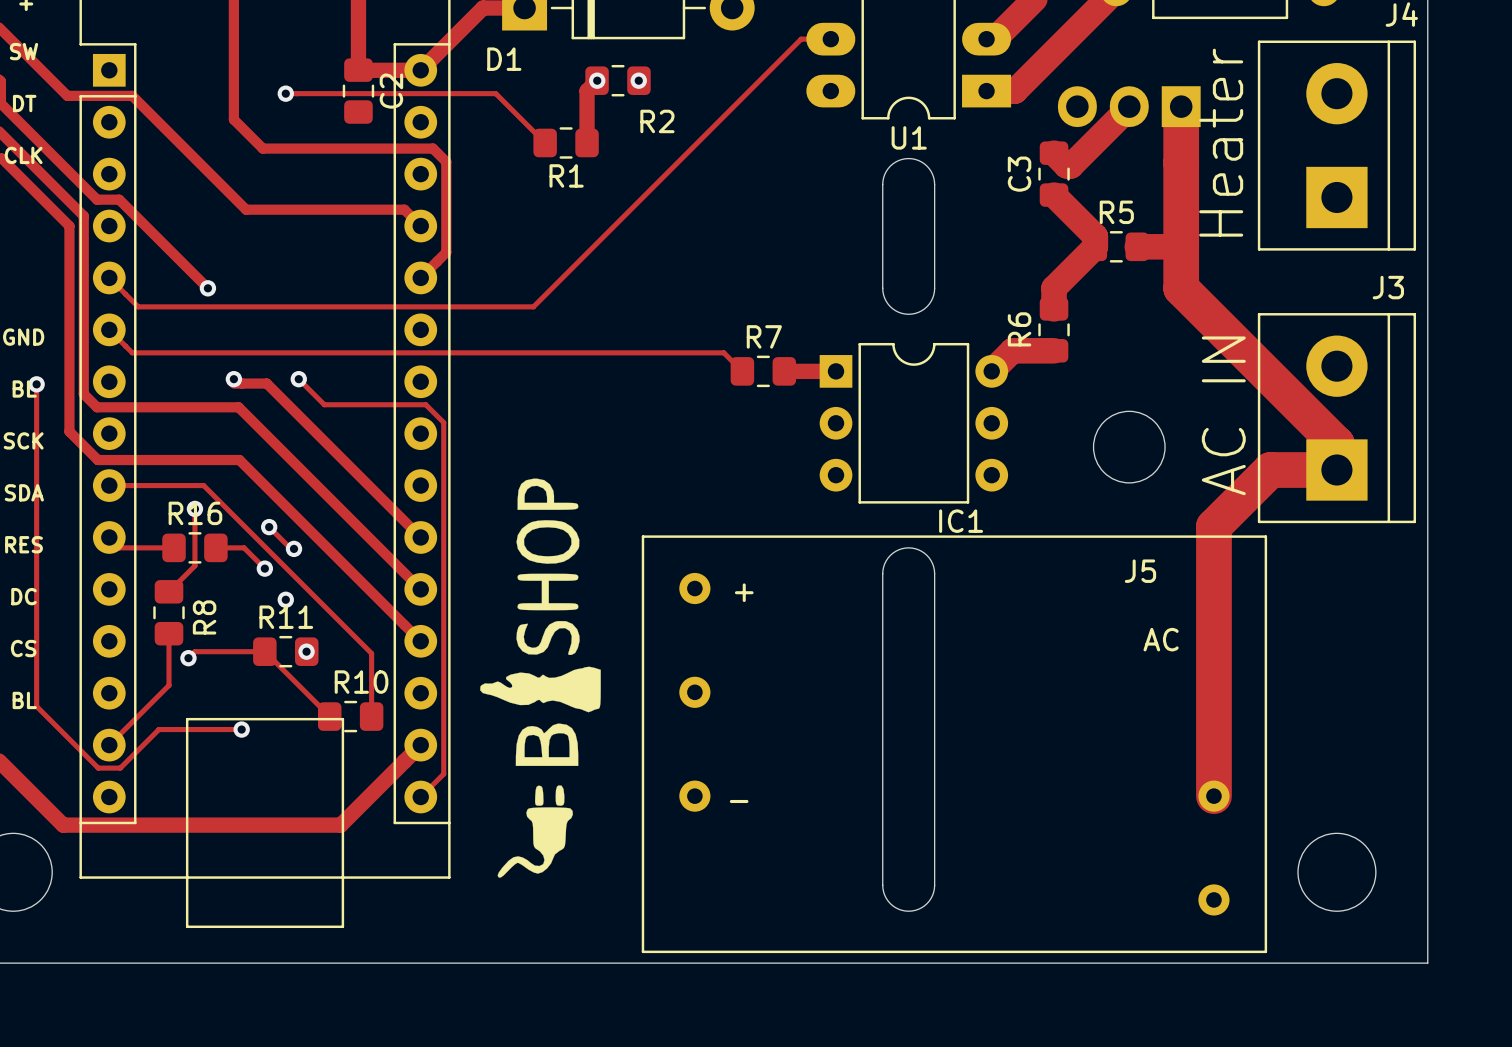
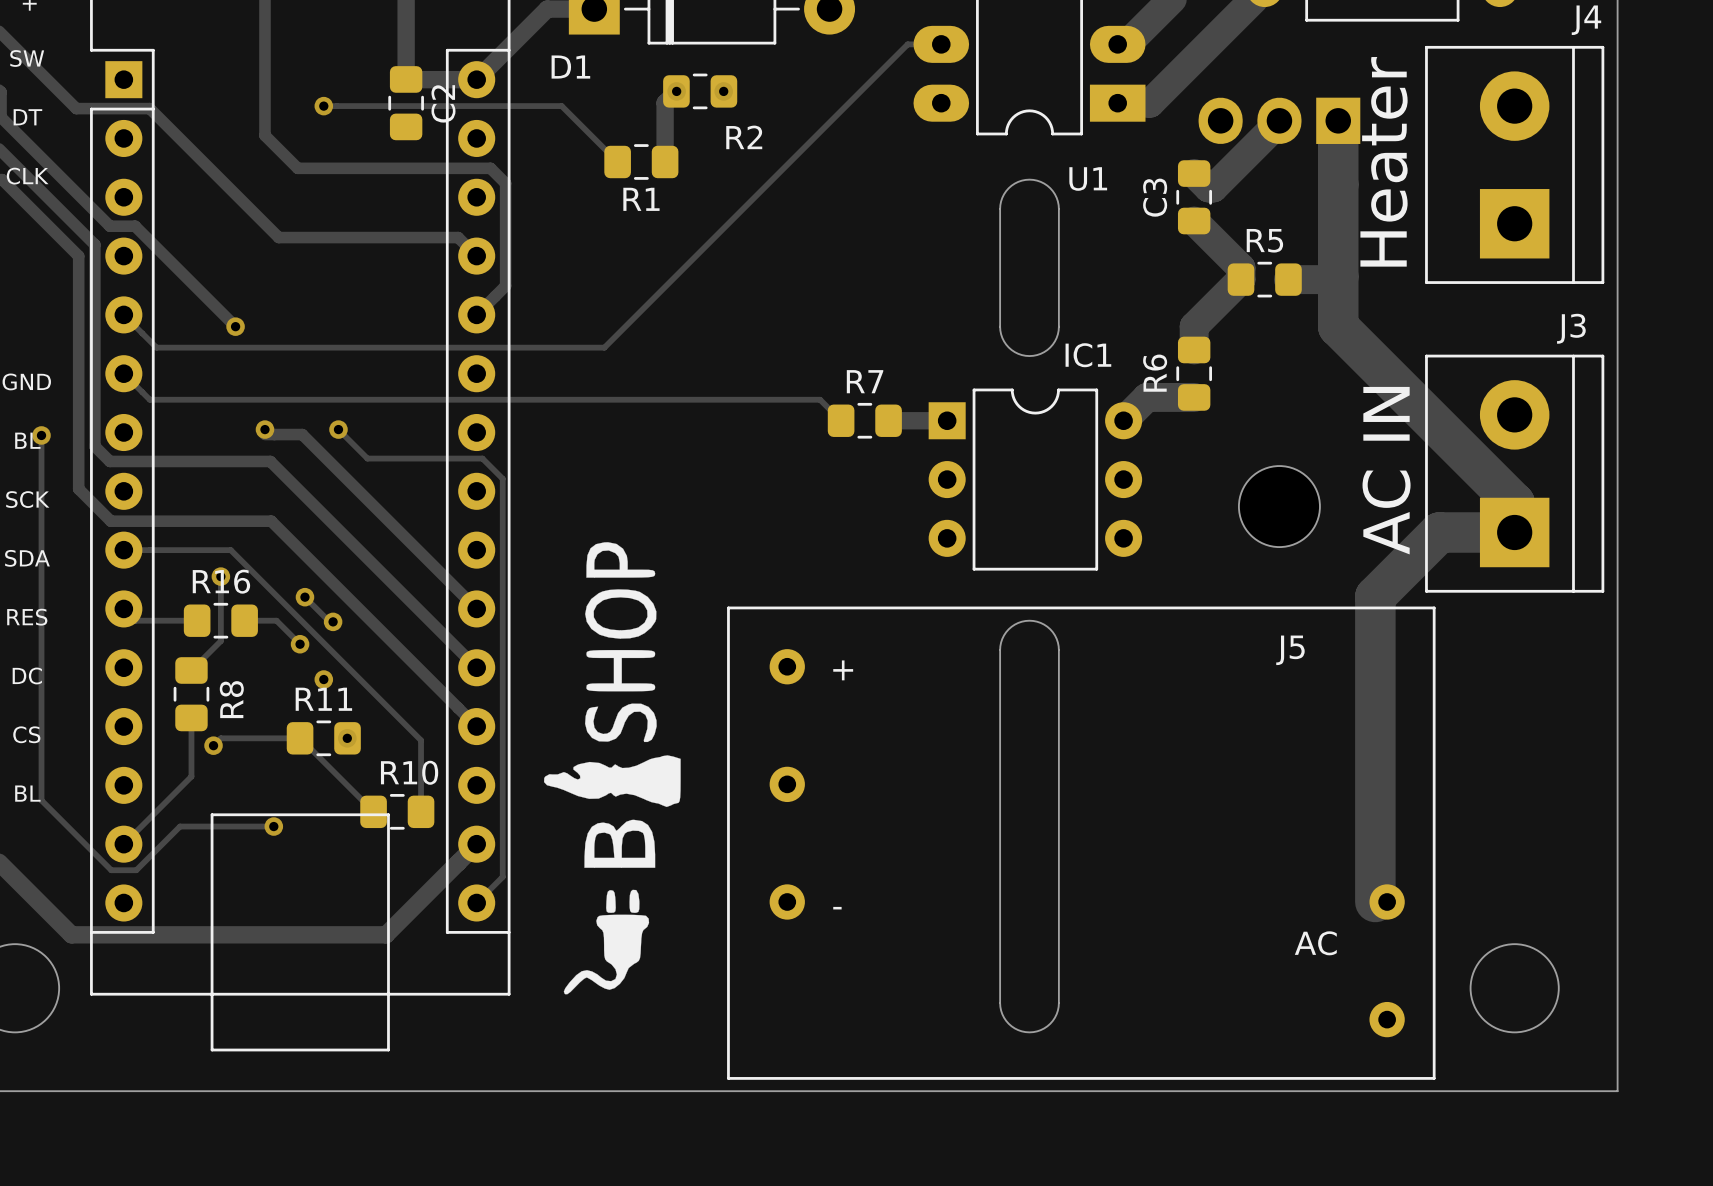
U1 name position: U1 (909, 137) -> U1 (1088, 178)
IC1 name position: IC1 (961, 521) -> IC1 (1088, 355)
J5 footprint: [641, 535, 1268, 954] -> [727, 606, 1436, 1080]

